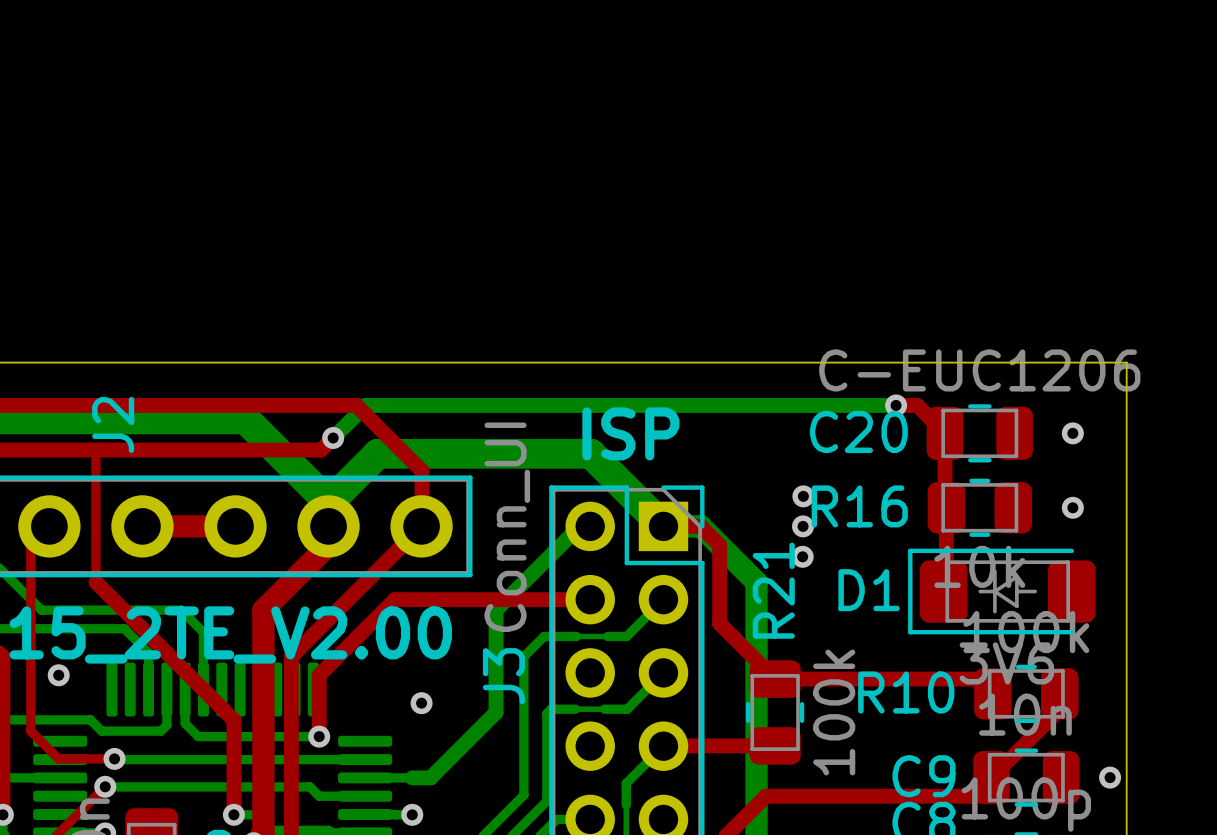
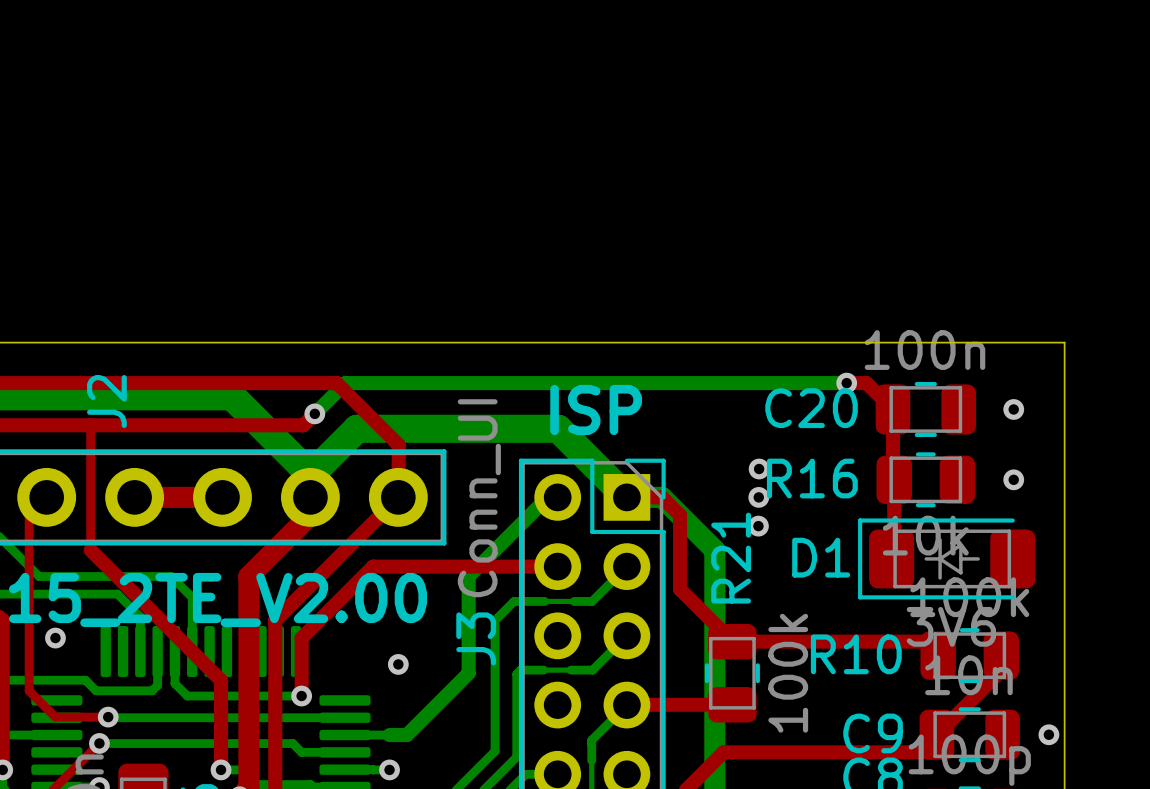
C20 value: C-EUC1206 (979, 370) -> 100n (925, 350)

